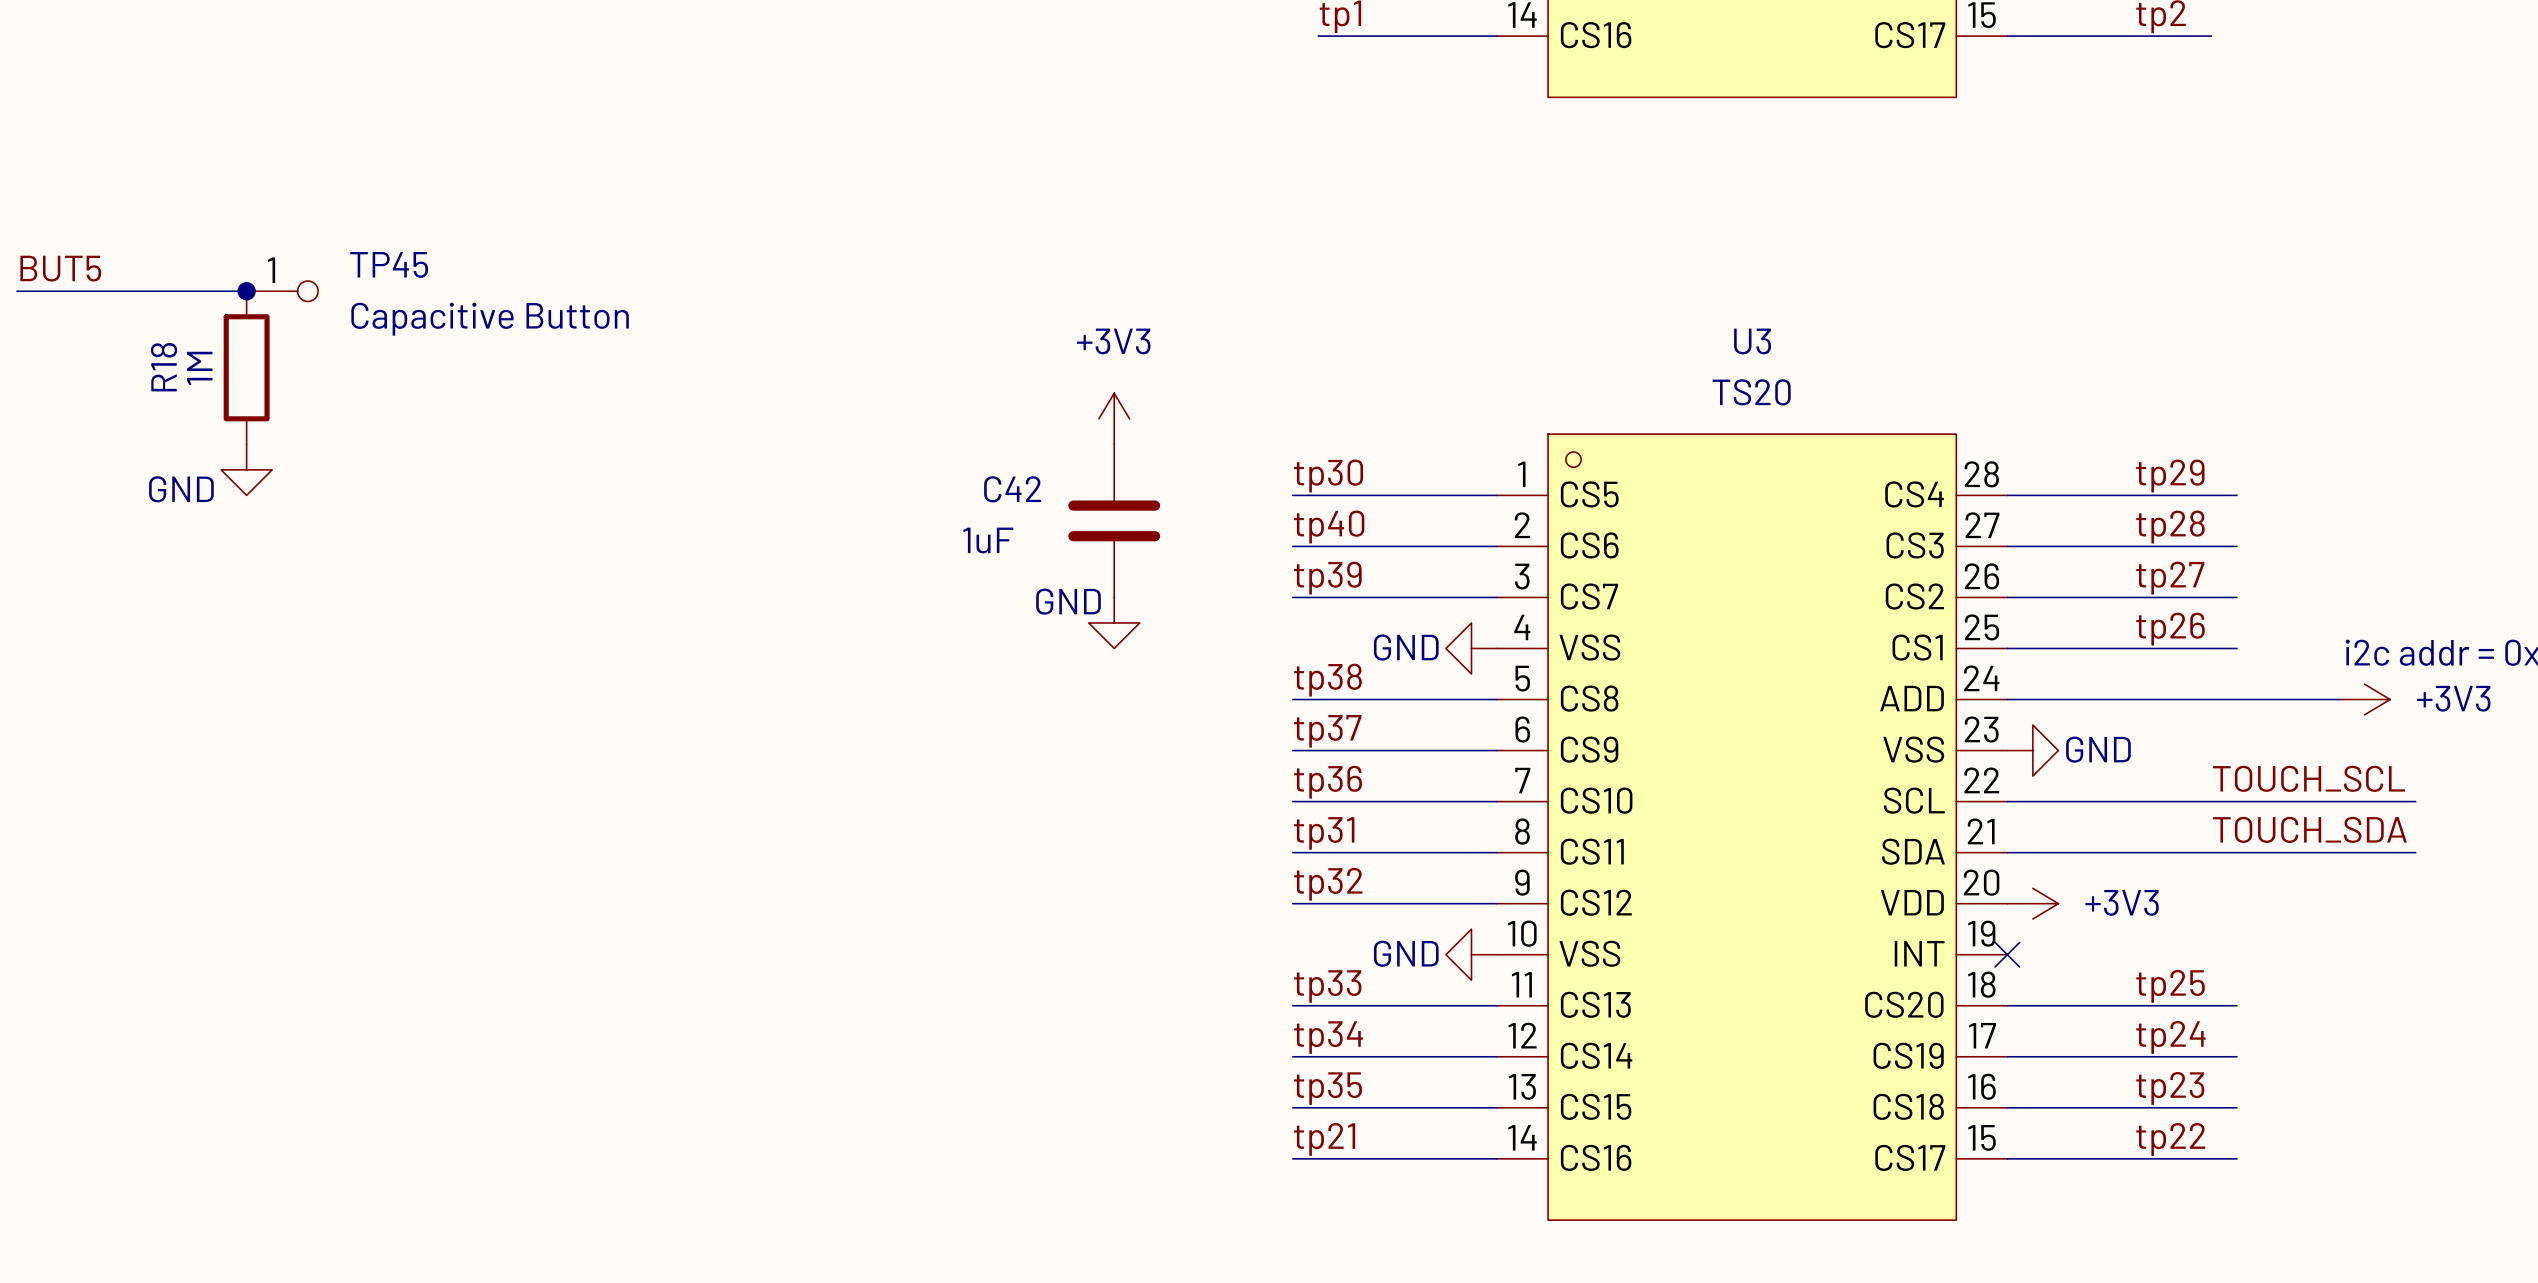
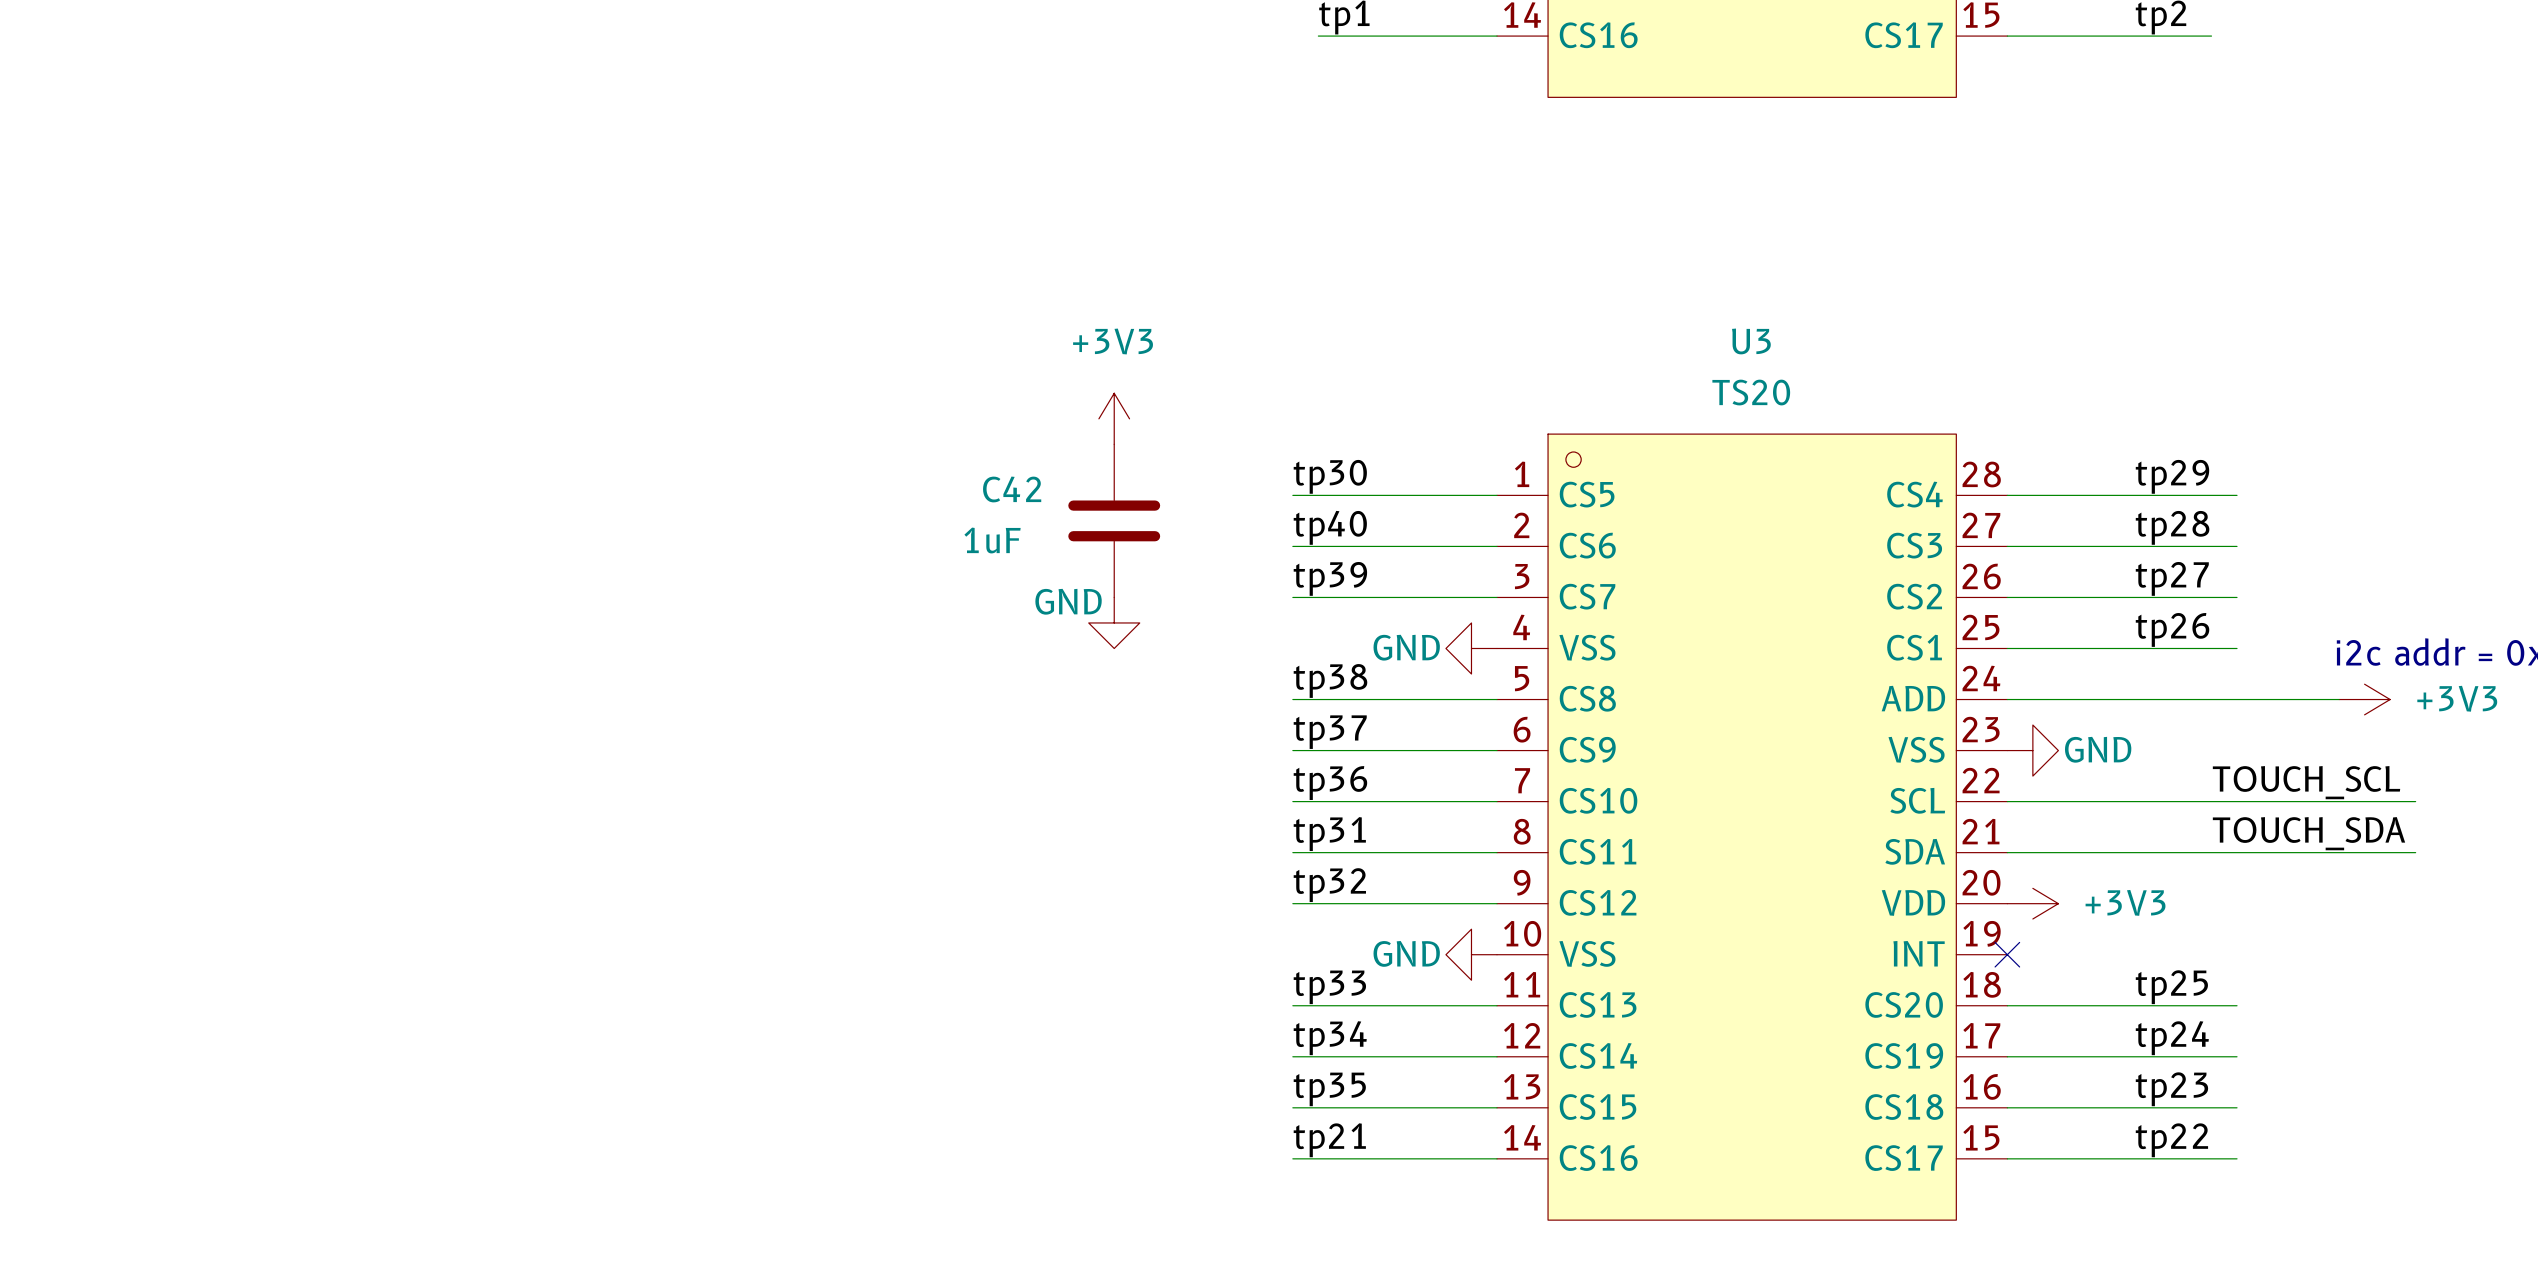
label: BUT5 (60, 268) -> none
wire: (16, 291) (246, 291) -> none
junction: (246, 291) -> none
TP45: Capacitive Button (282, 291) -> none
R18: 1M (246, 367) -> none
power symbol: GND (246, 469) -> none

